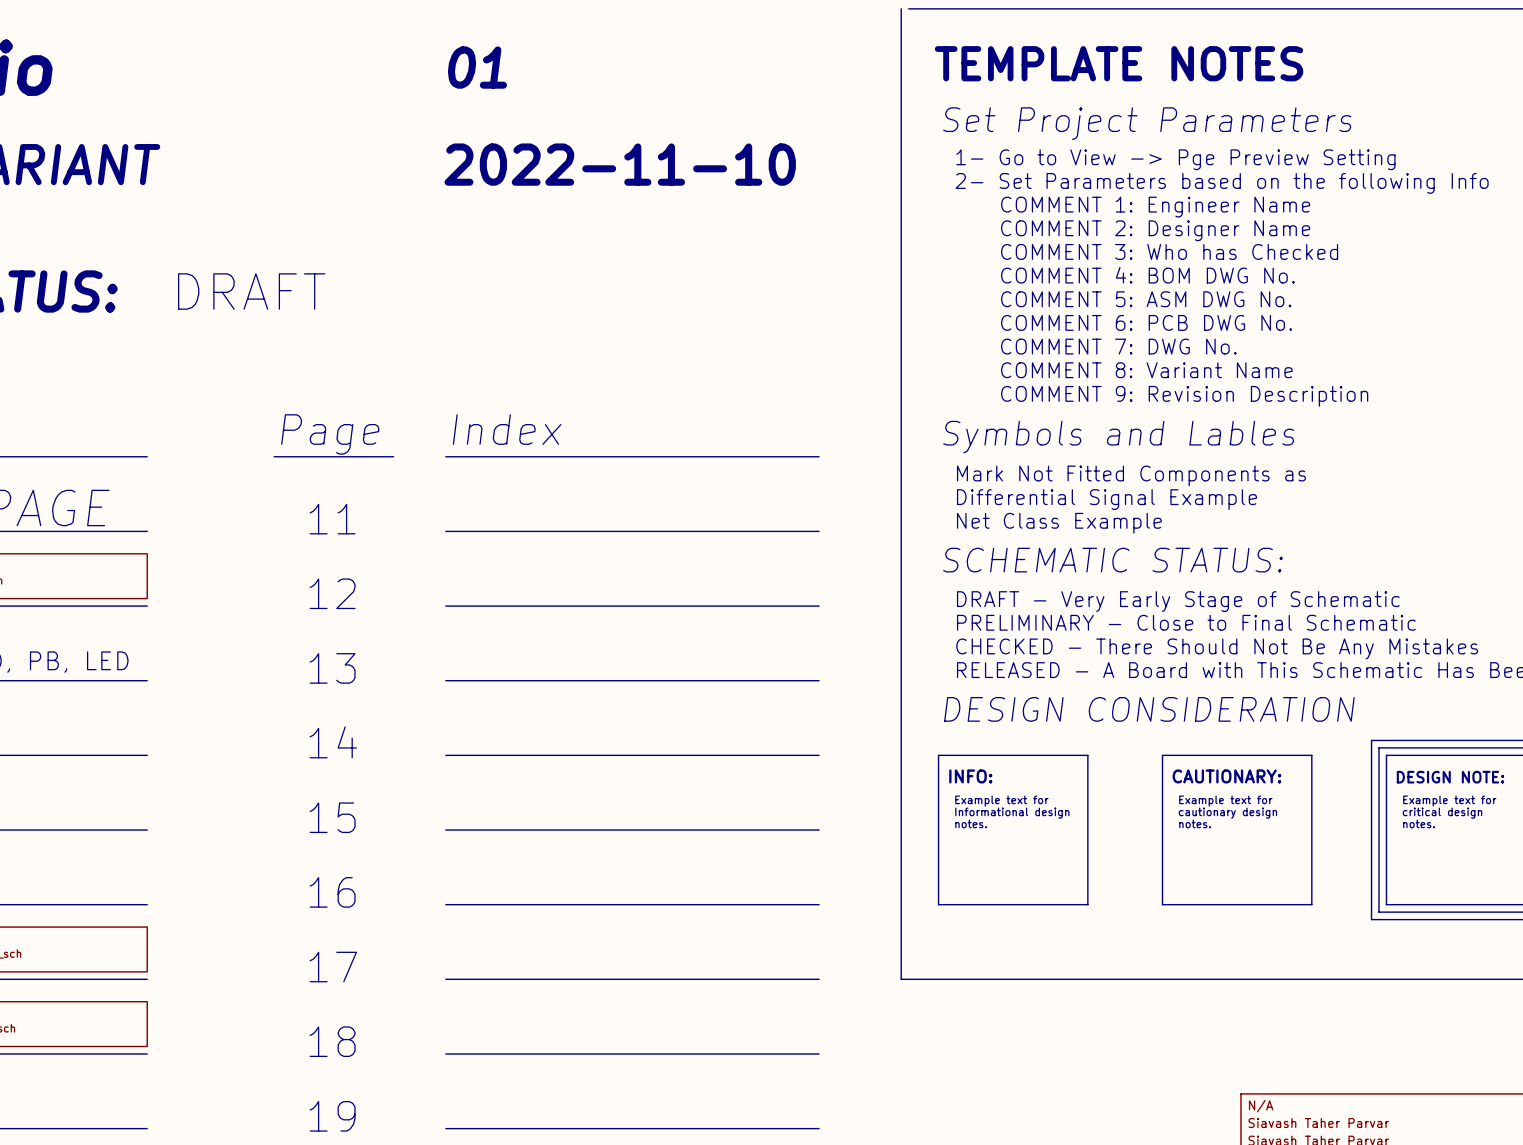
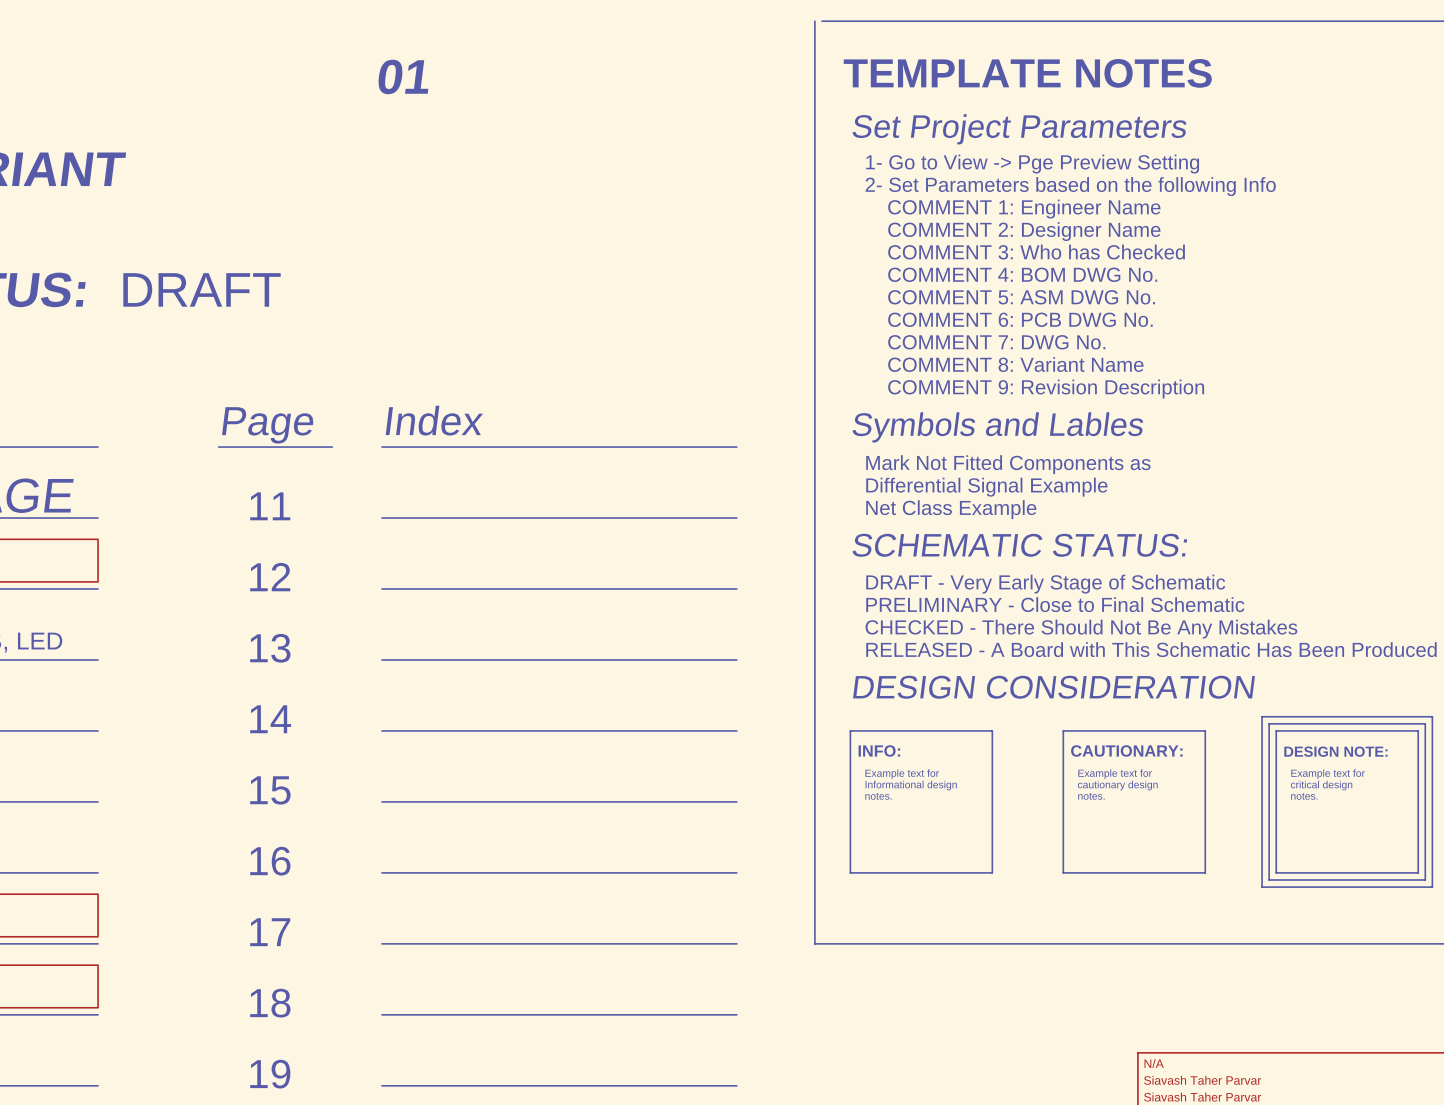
text: 2022-11-10 (620, 164) -> none

